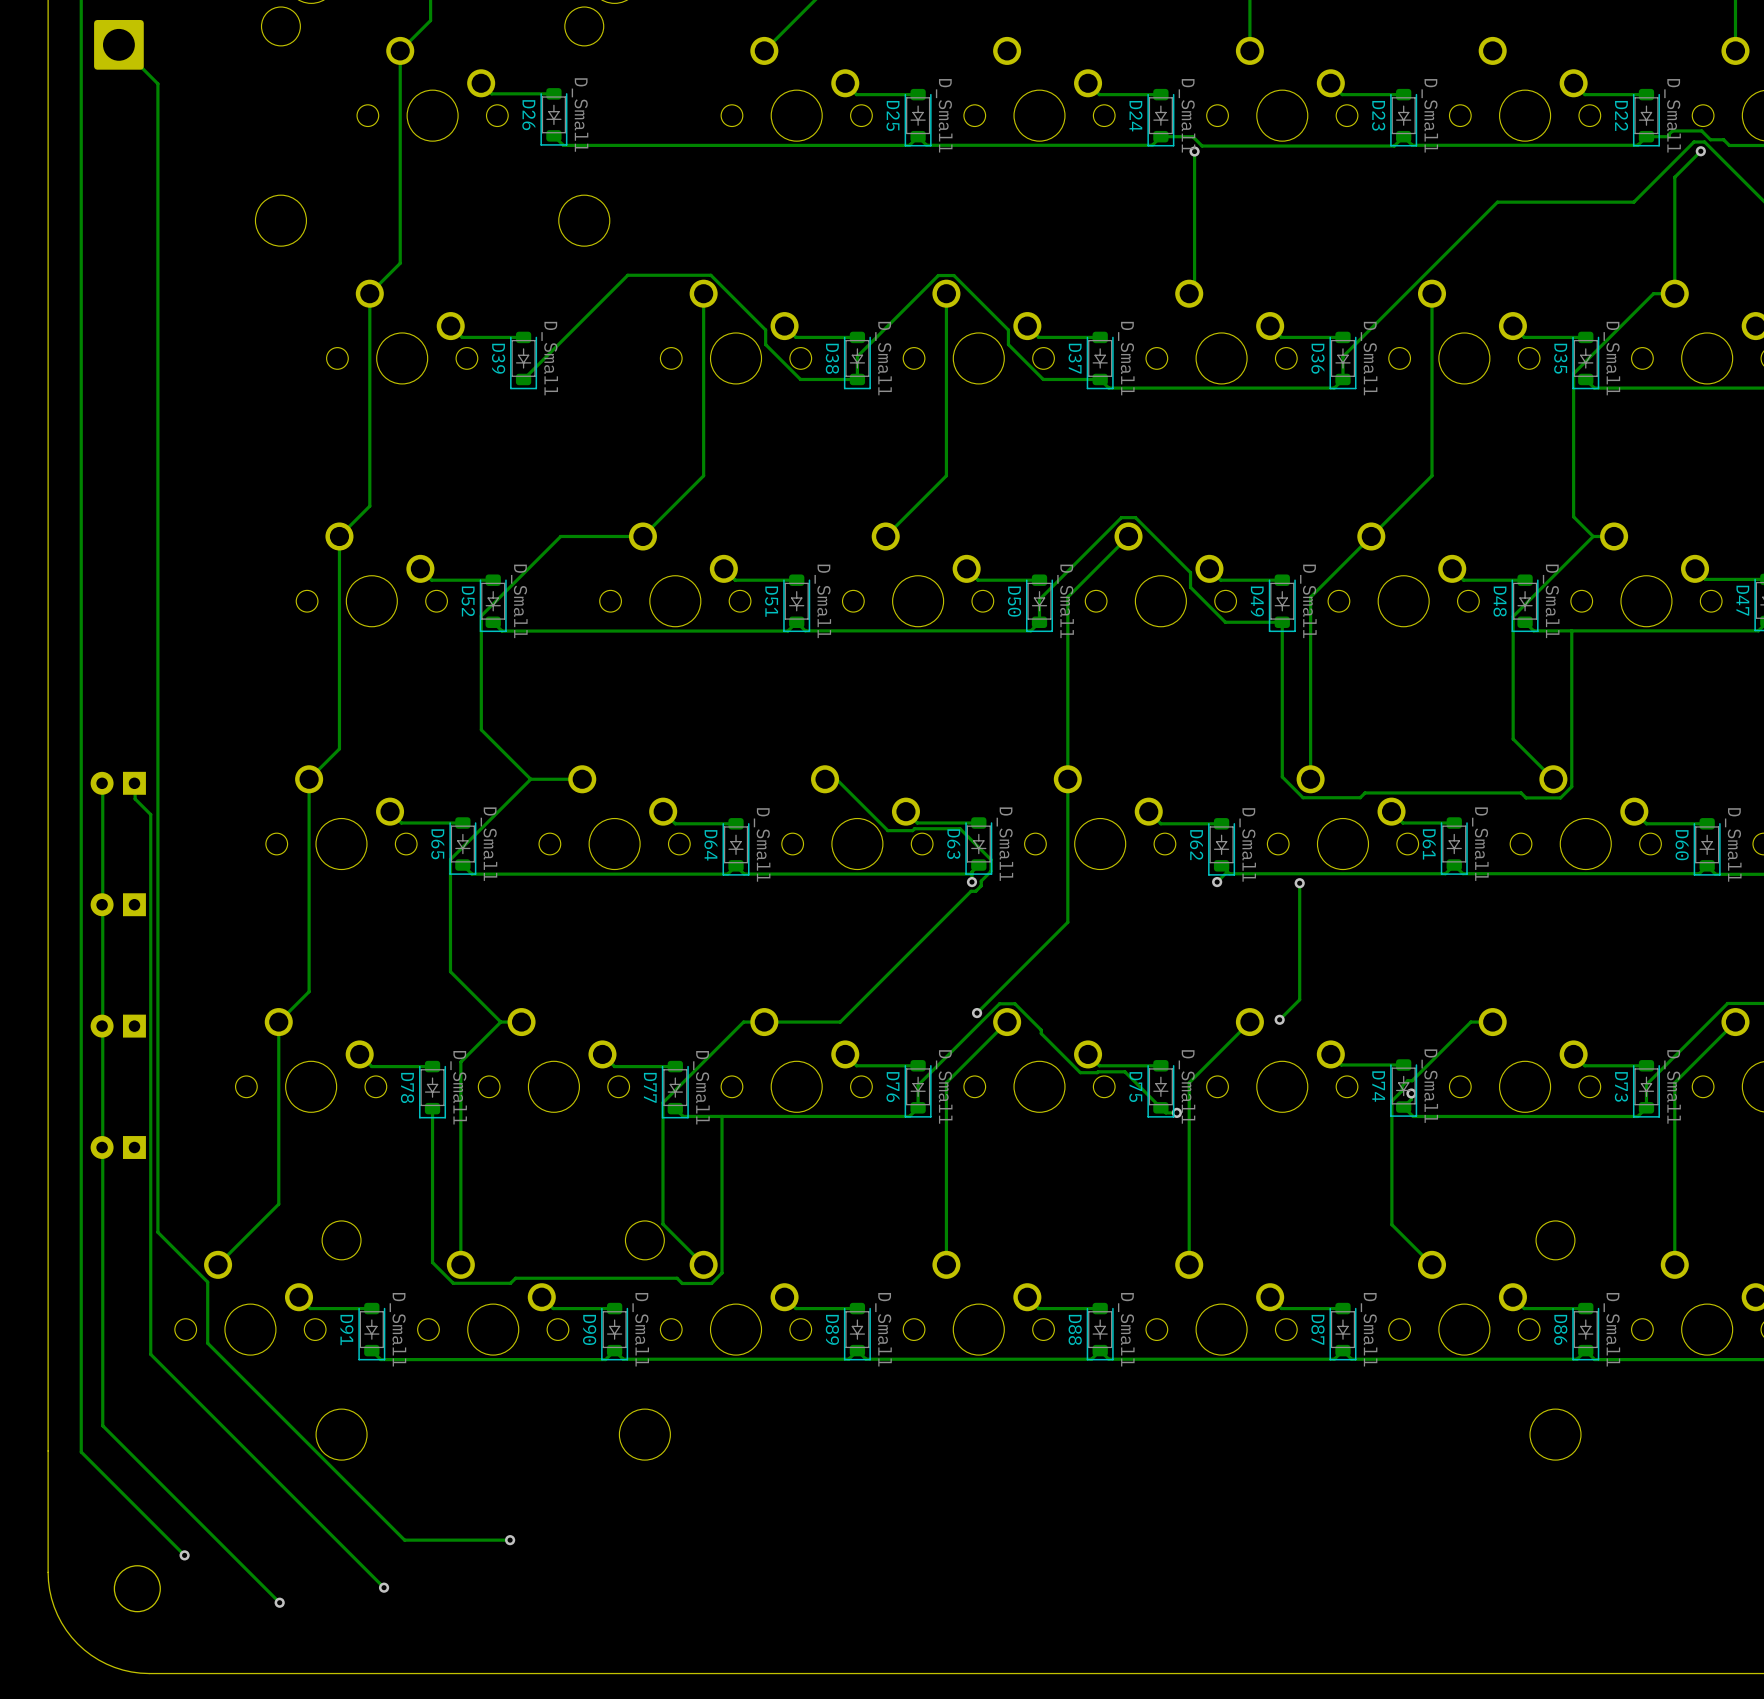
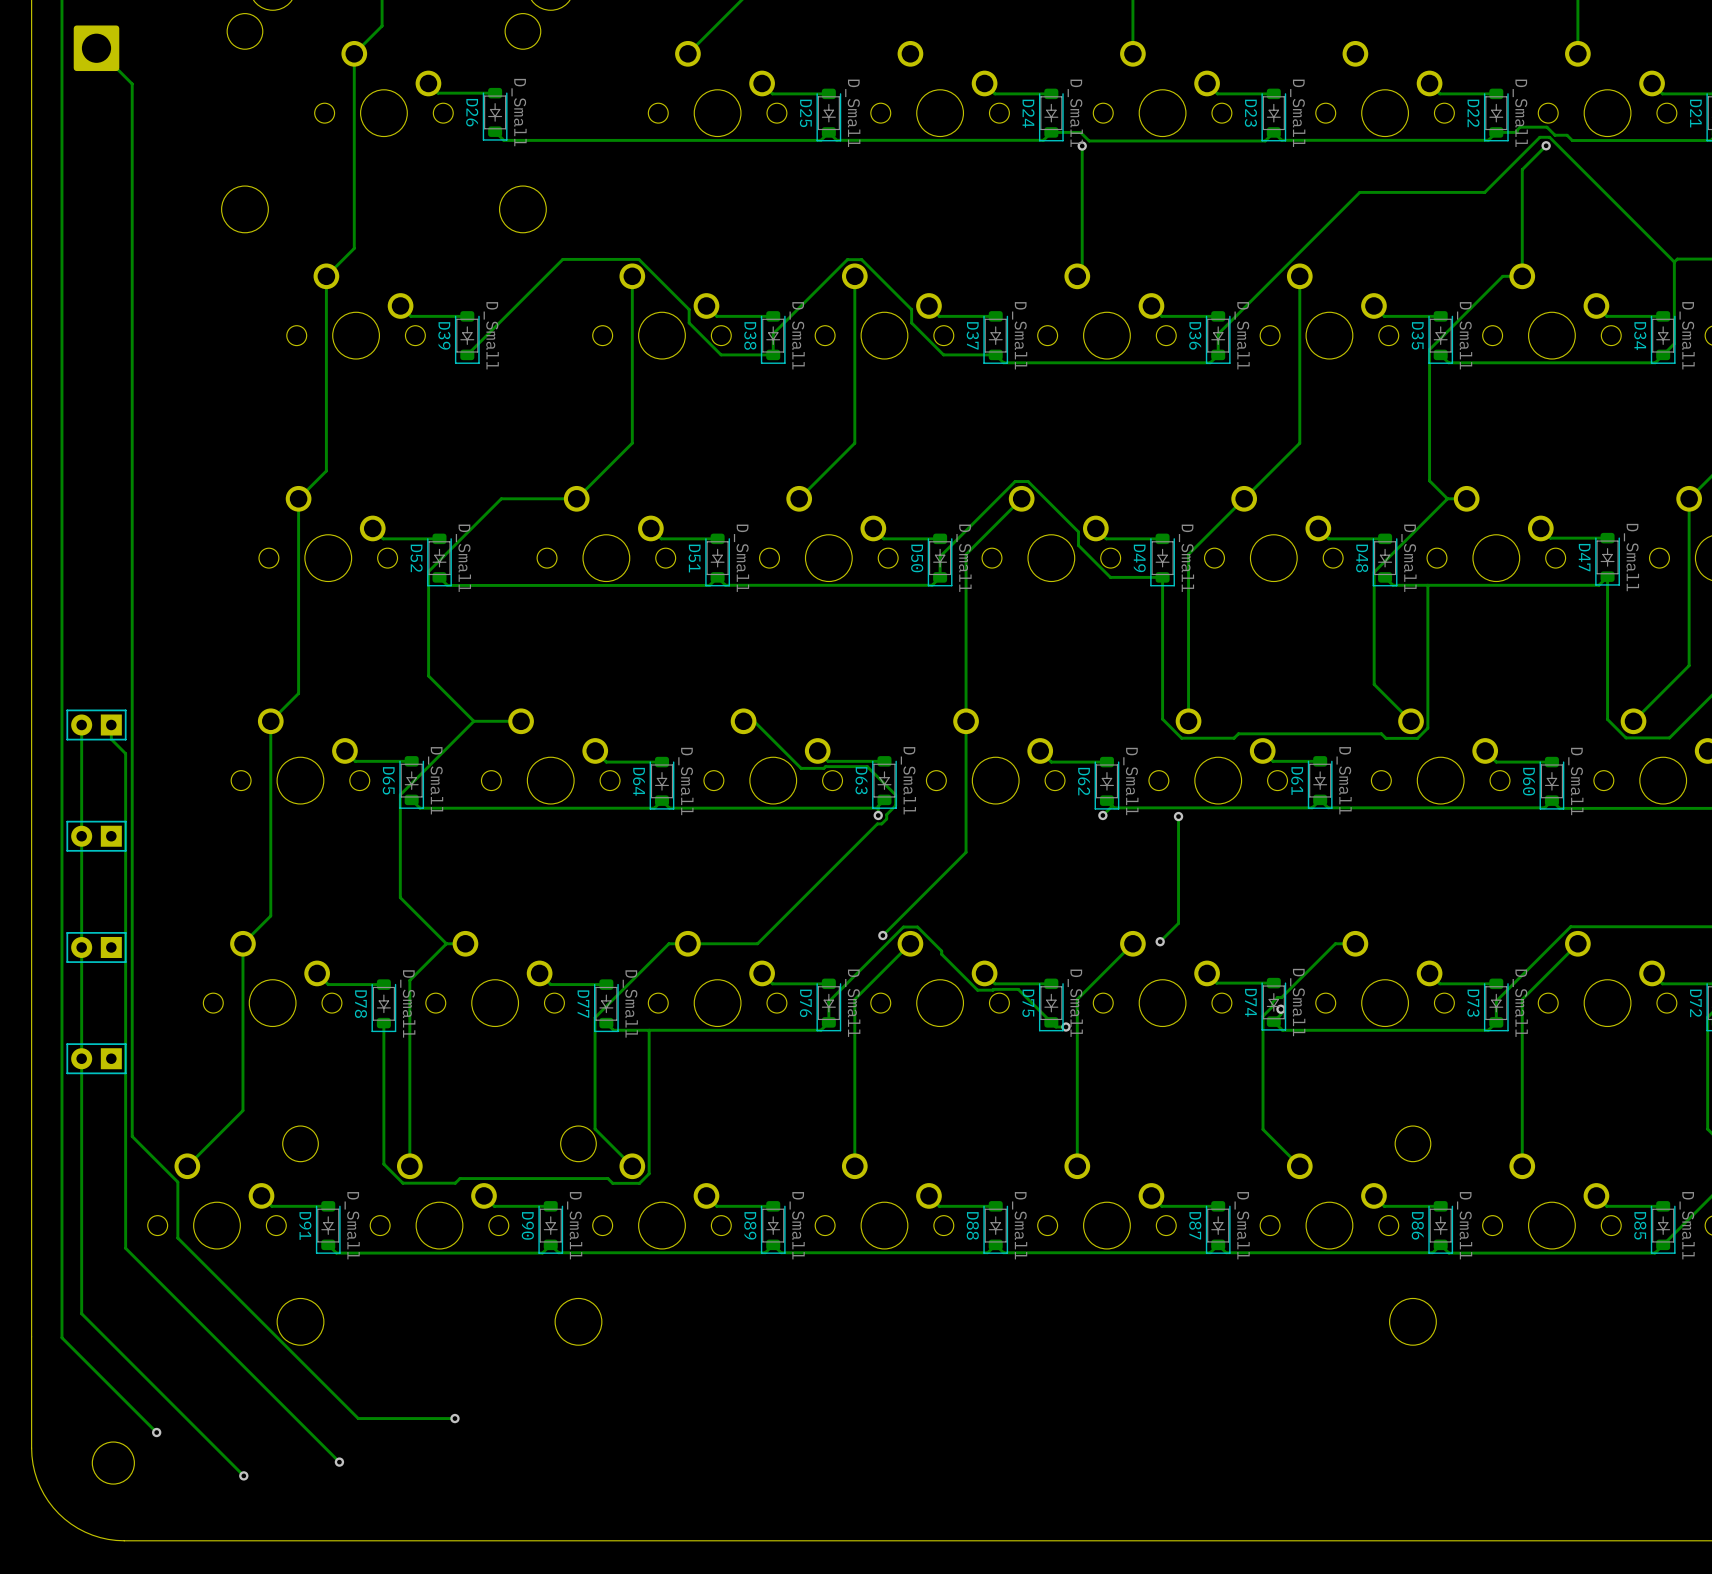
part footprint: [90, 771, 146, 795] -> [66, 709, 127, 741]
part footprint: [90, 893, 146, 917] -> [66, 820, 127, 852]
part footprint: [90, 1014, 146, 1038] -> [66, 932, 127, 963]
part footprint: [90, 1136, 146, 1159] -> [66, 1043, 127, 1075]

